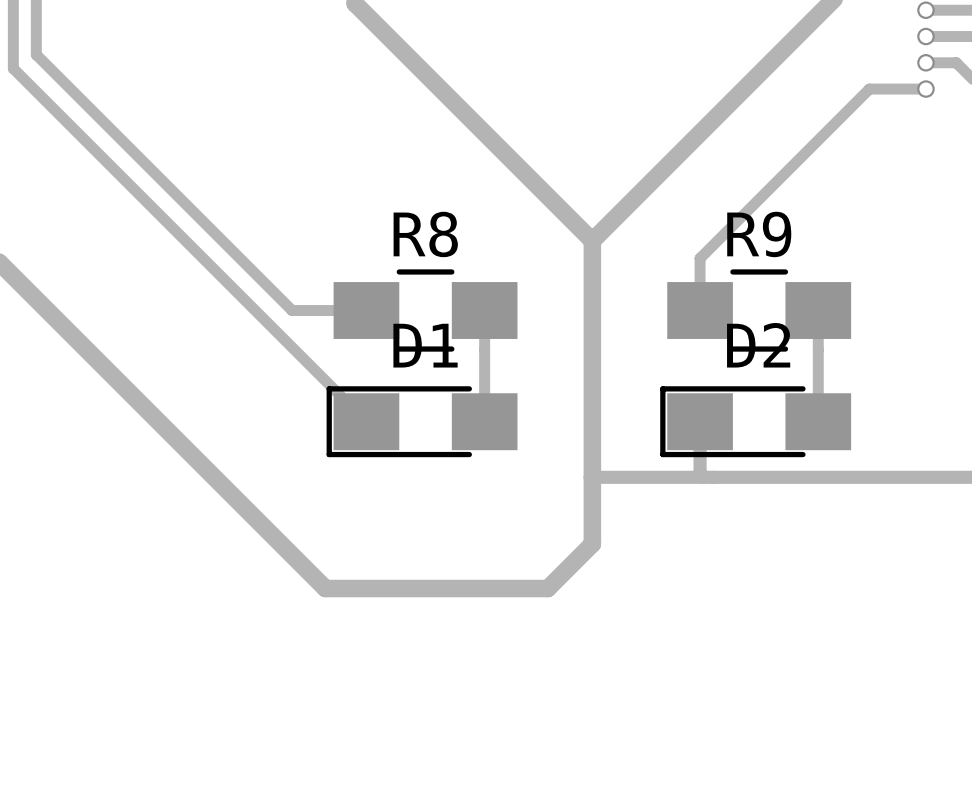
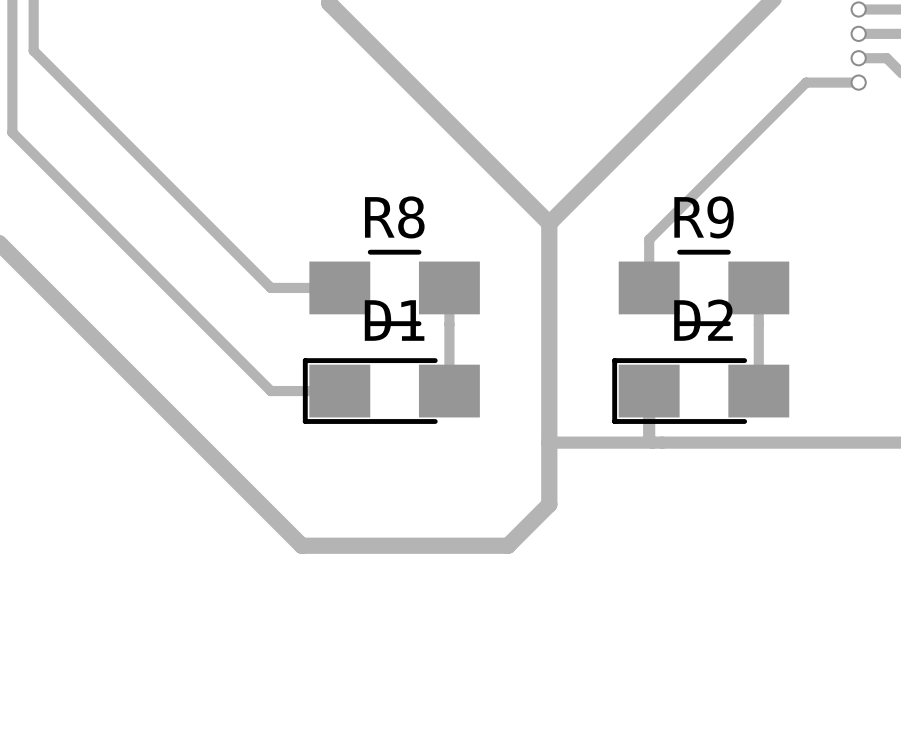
track: (13, 68) (366, 421) -> (12, 63) (12, 132) (270, 391) (339, 391)

